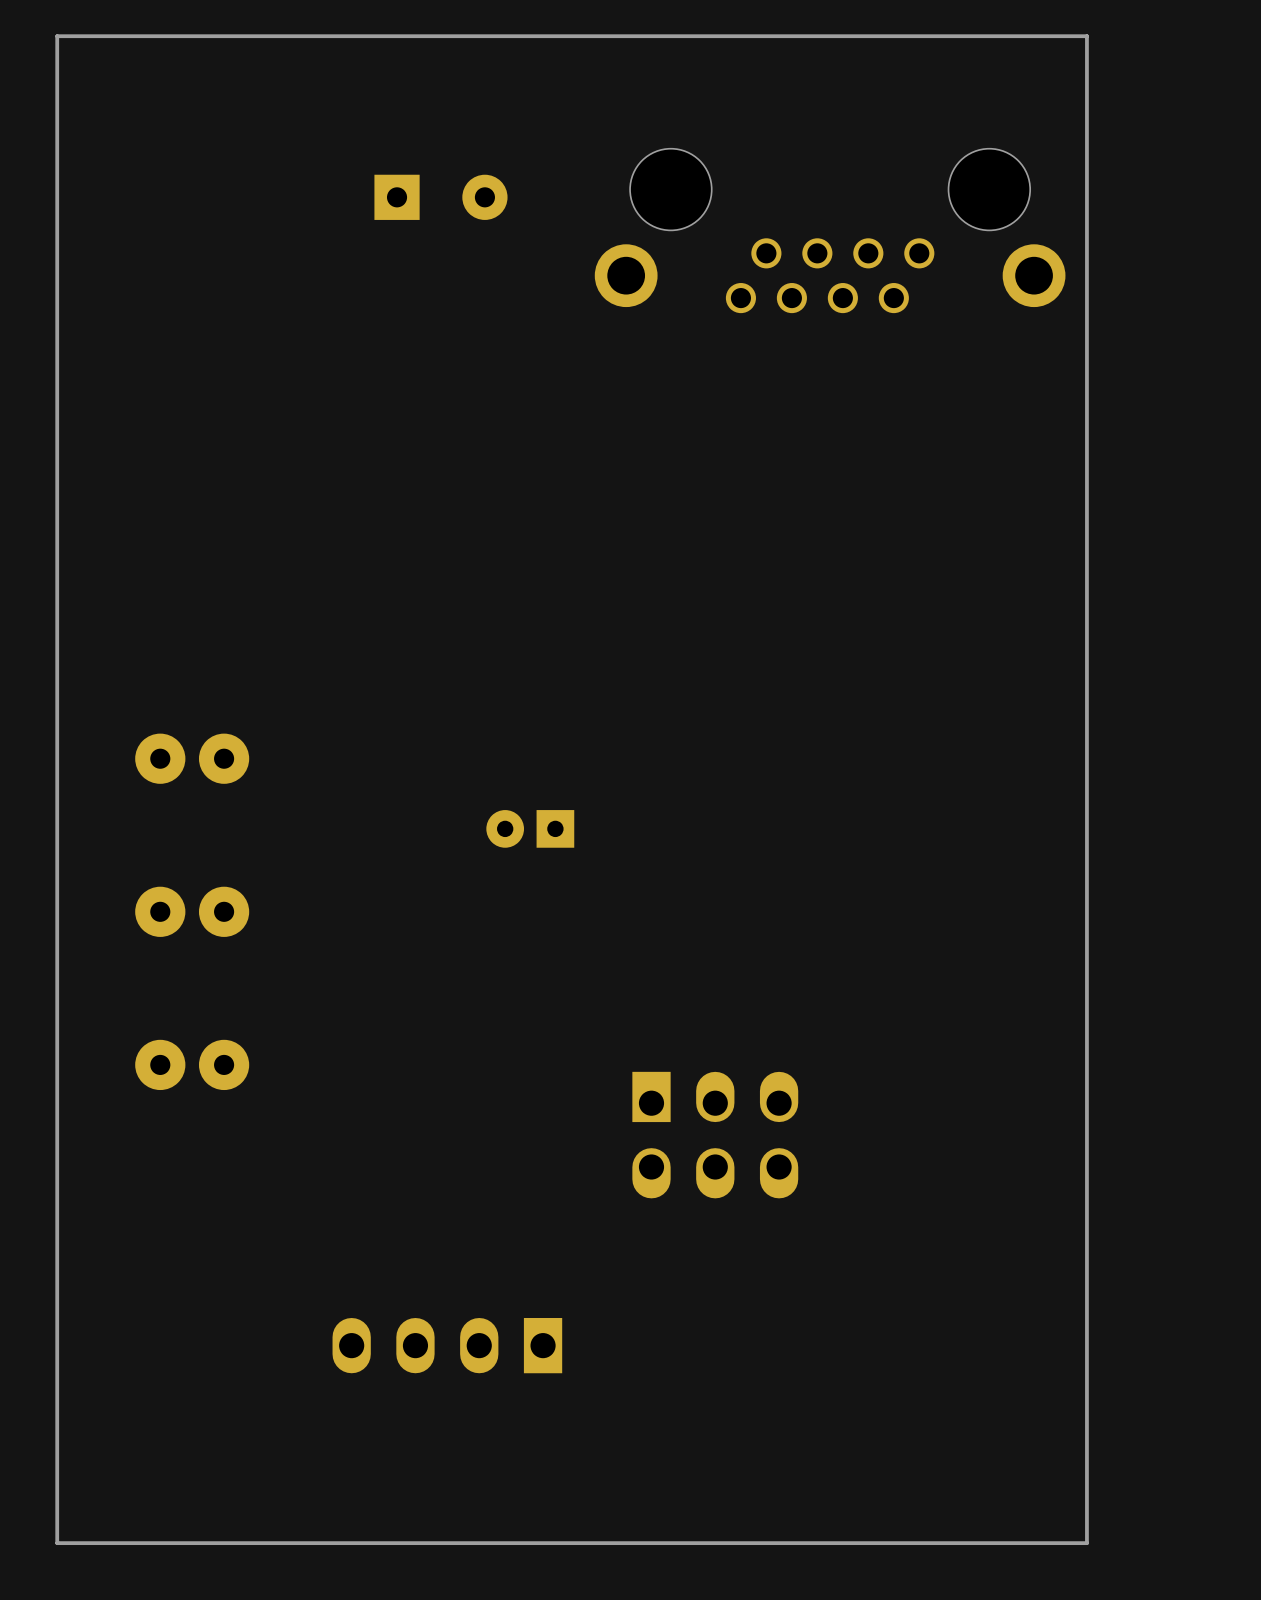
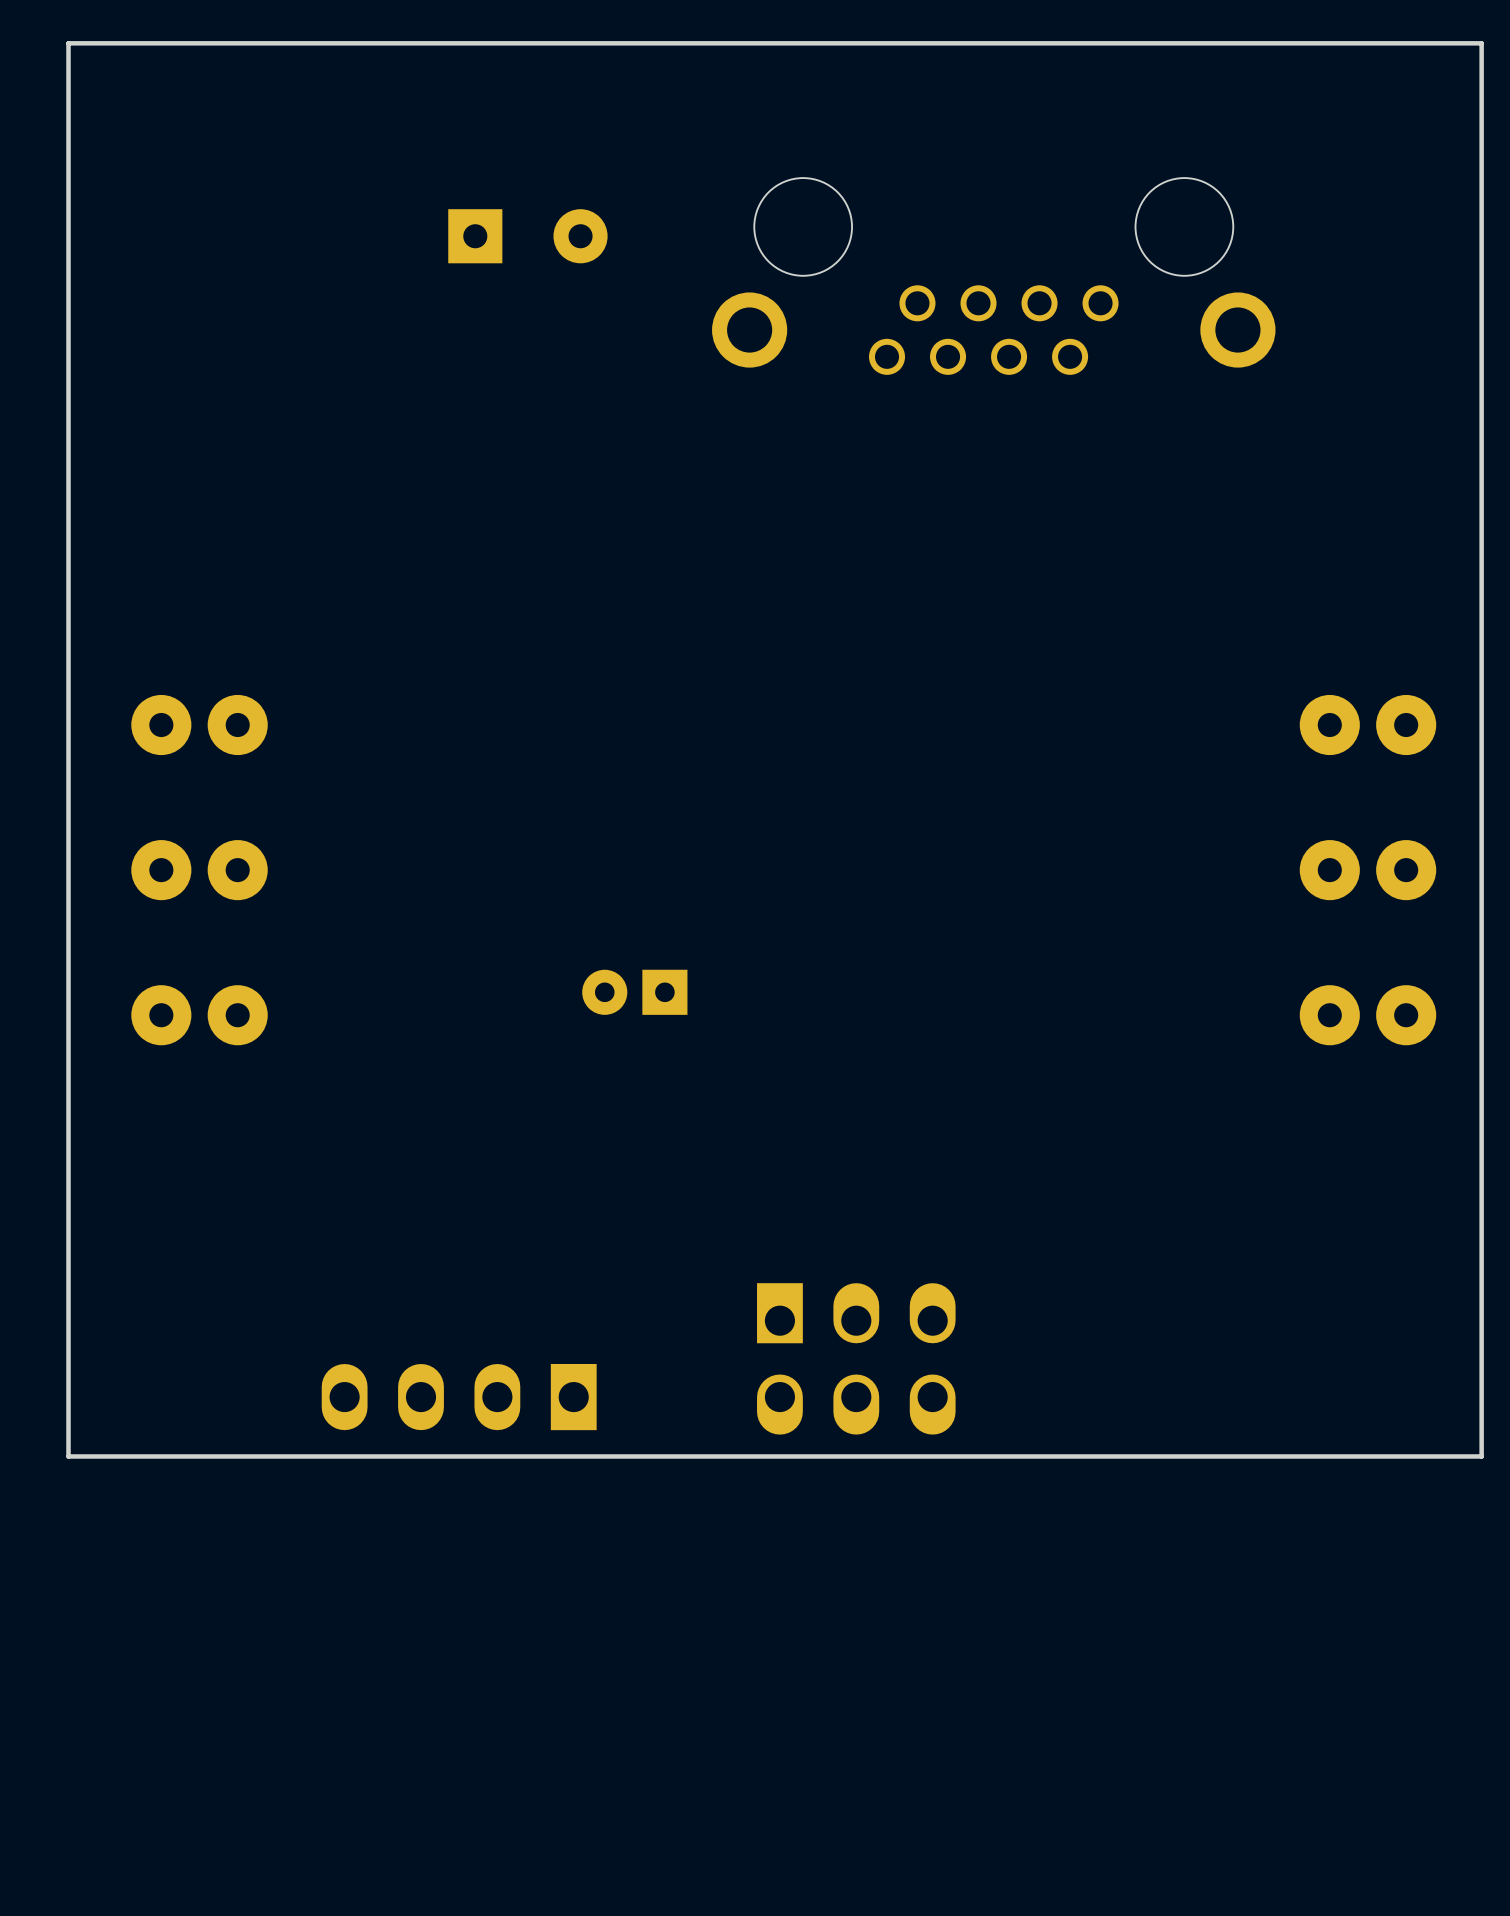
board edge: (1086, 36) (1086, 1543) (57, 1543) (57, 1216) -> (1301, 43) (1481, 43) (1481, 1456) (68, 1456)
part: none -> (199, 725)
part: none -> (1367, 725)
part: none -> (1367, 870)
part position: (192, 758) -> (199, 870)
part: none -> (199, 1015)
part: none -> (1367, 1015)
part: (192, 911) -> none
part: (192, 1064) -> none
part position: (447, 1345) -> (459, 1397)

